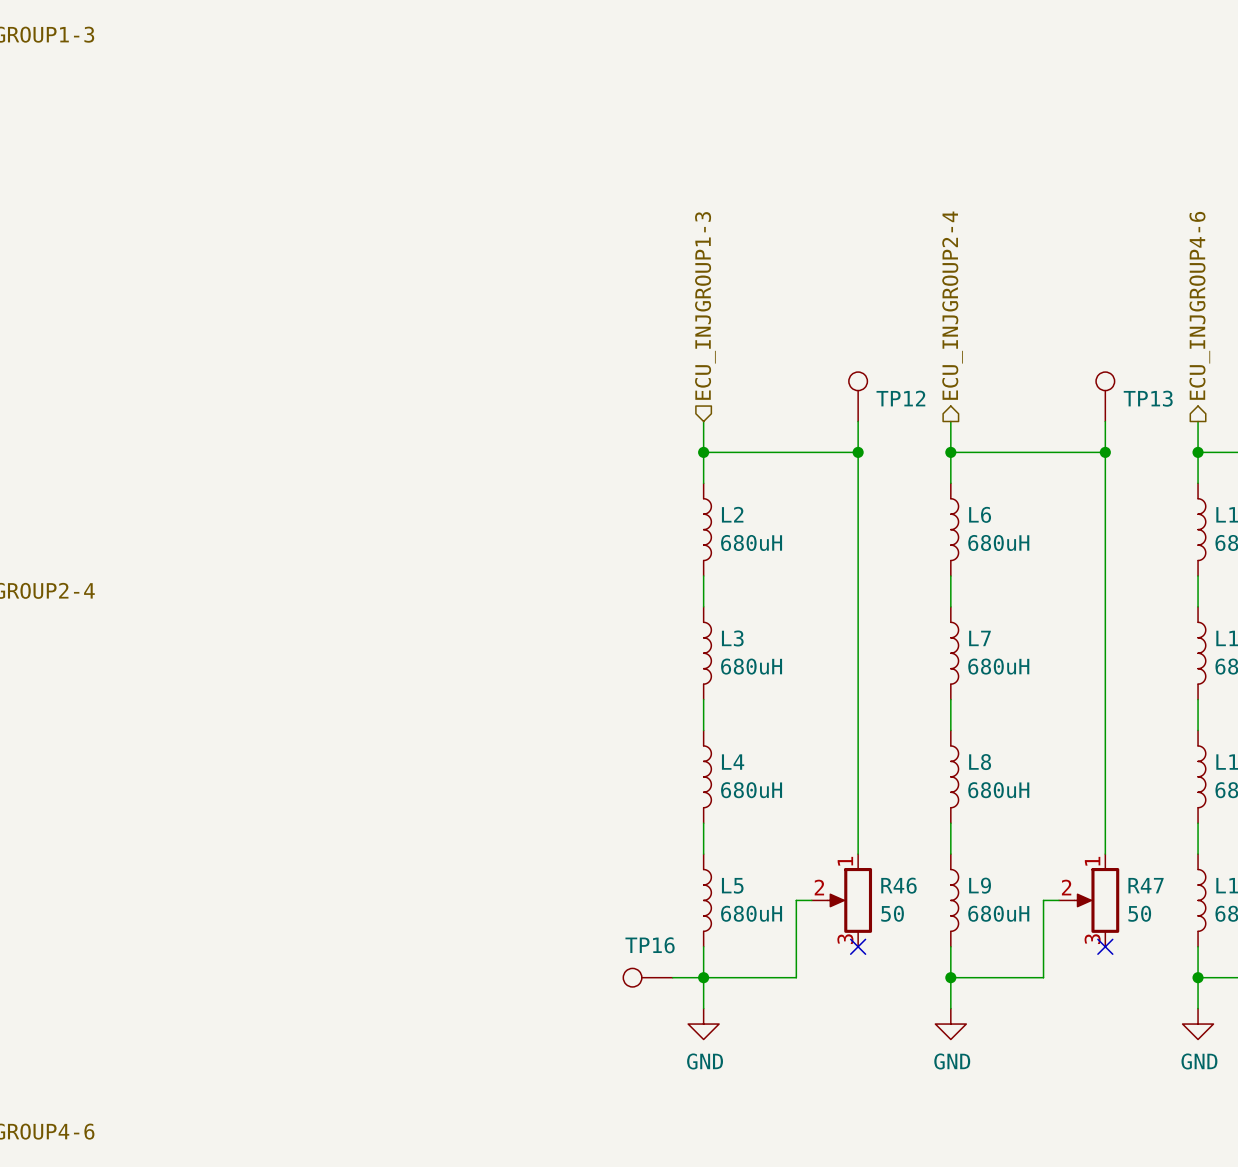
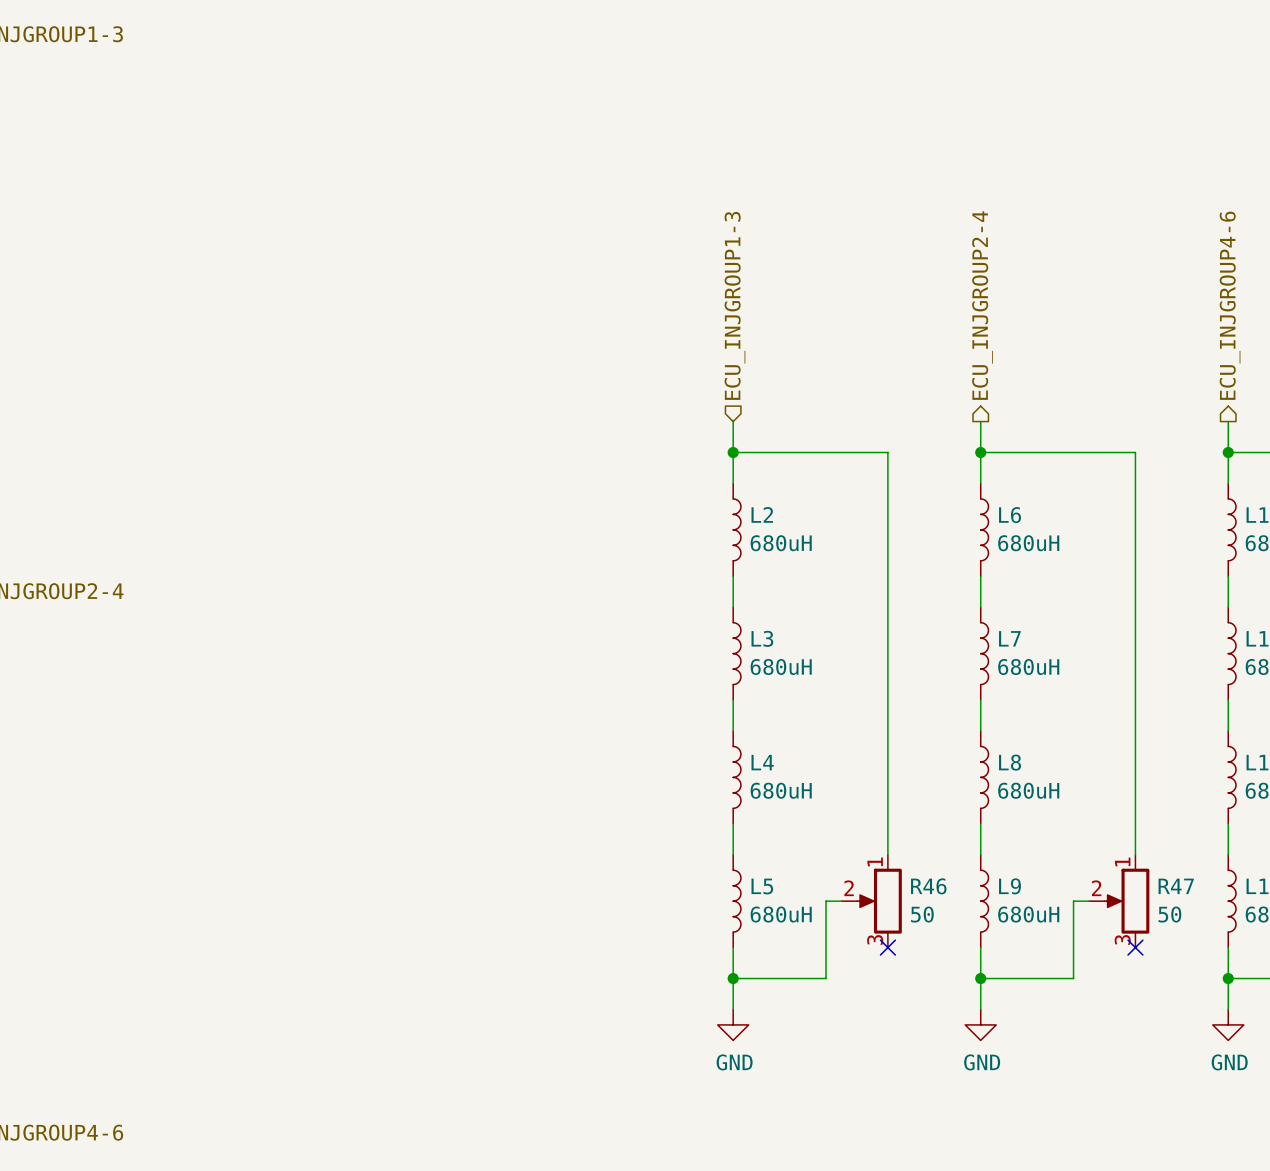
TP12: (858, 396) -> none
TP13: (1105, 396) -> none
wire: (858, 421) (858, 452) -> none
wire: (1105, 421) (1105, 452) -> none
junction: (858, 452) -> none
junction: (1105, 452) -> none
TP16: (648, 977) -> none
wire: (672, 977) (703, 977) -> none

